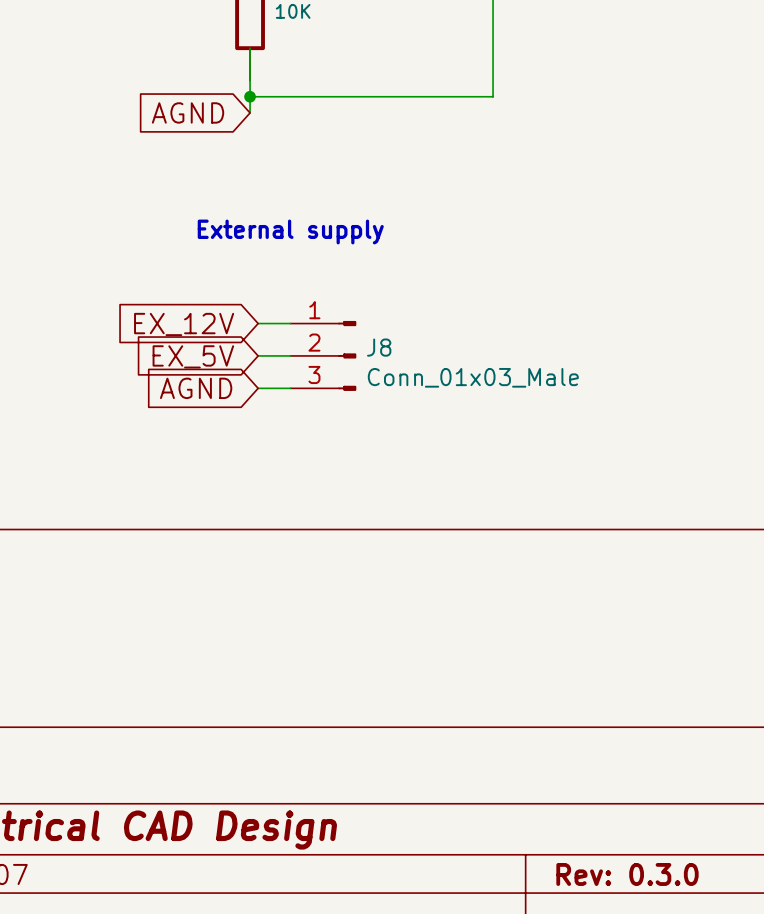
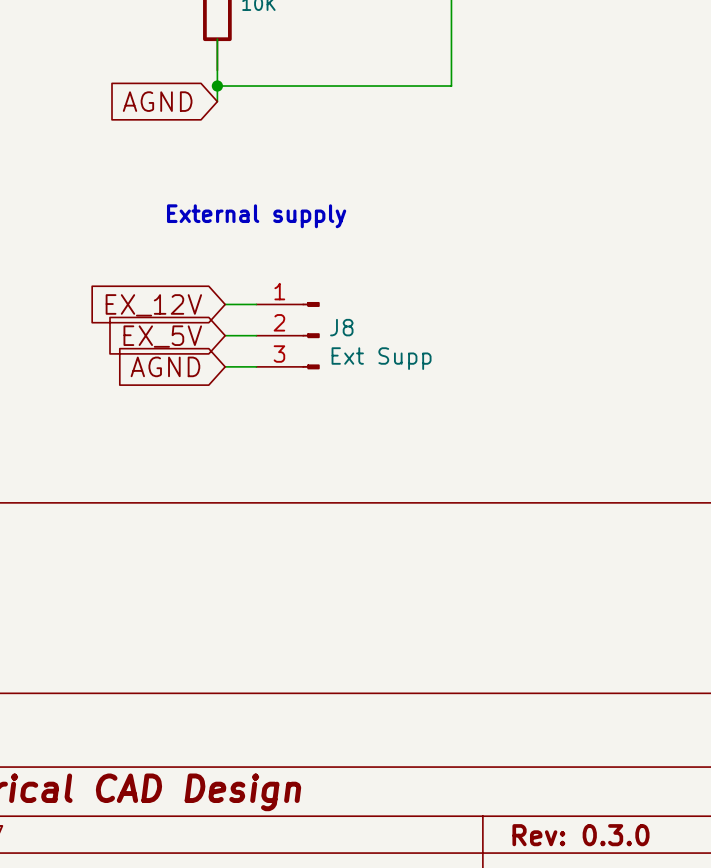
J8 value: Conn_01x03_Male (473, 377) -> Ext Supp (381, 358)

